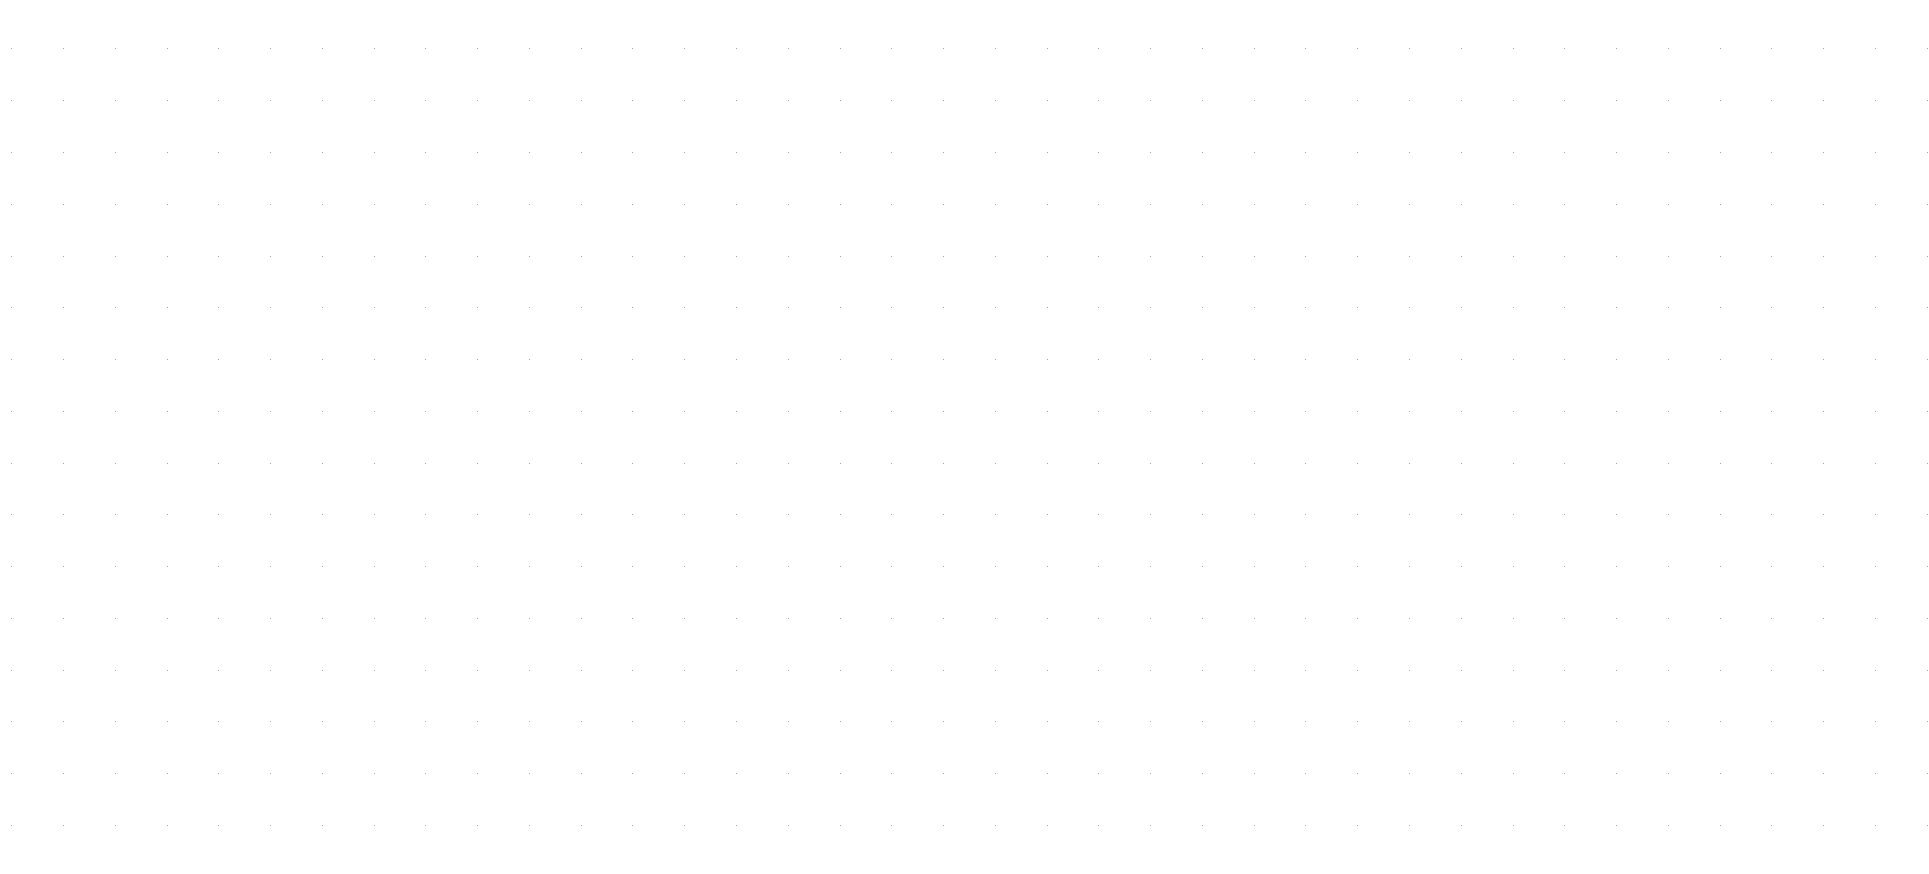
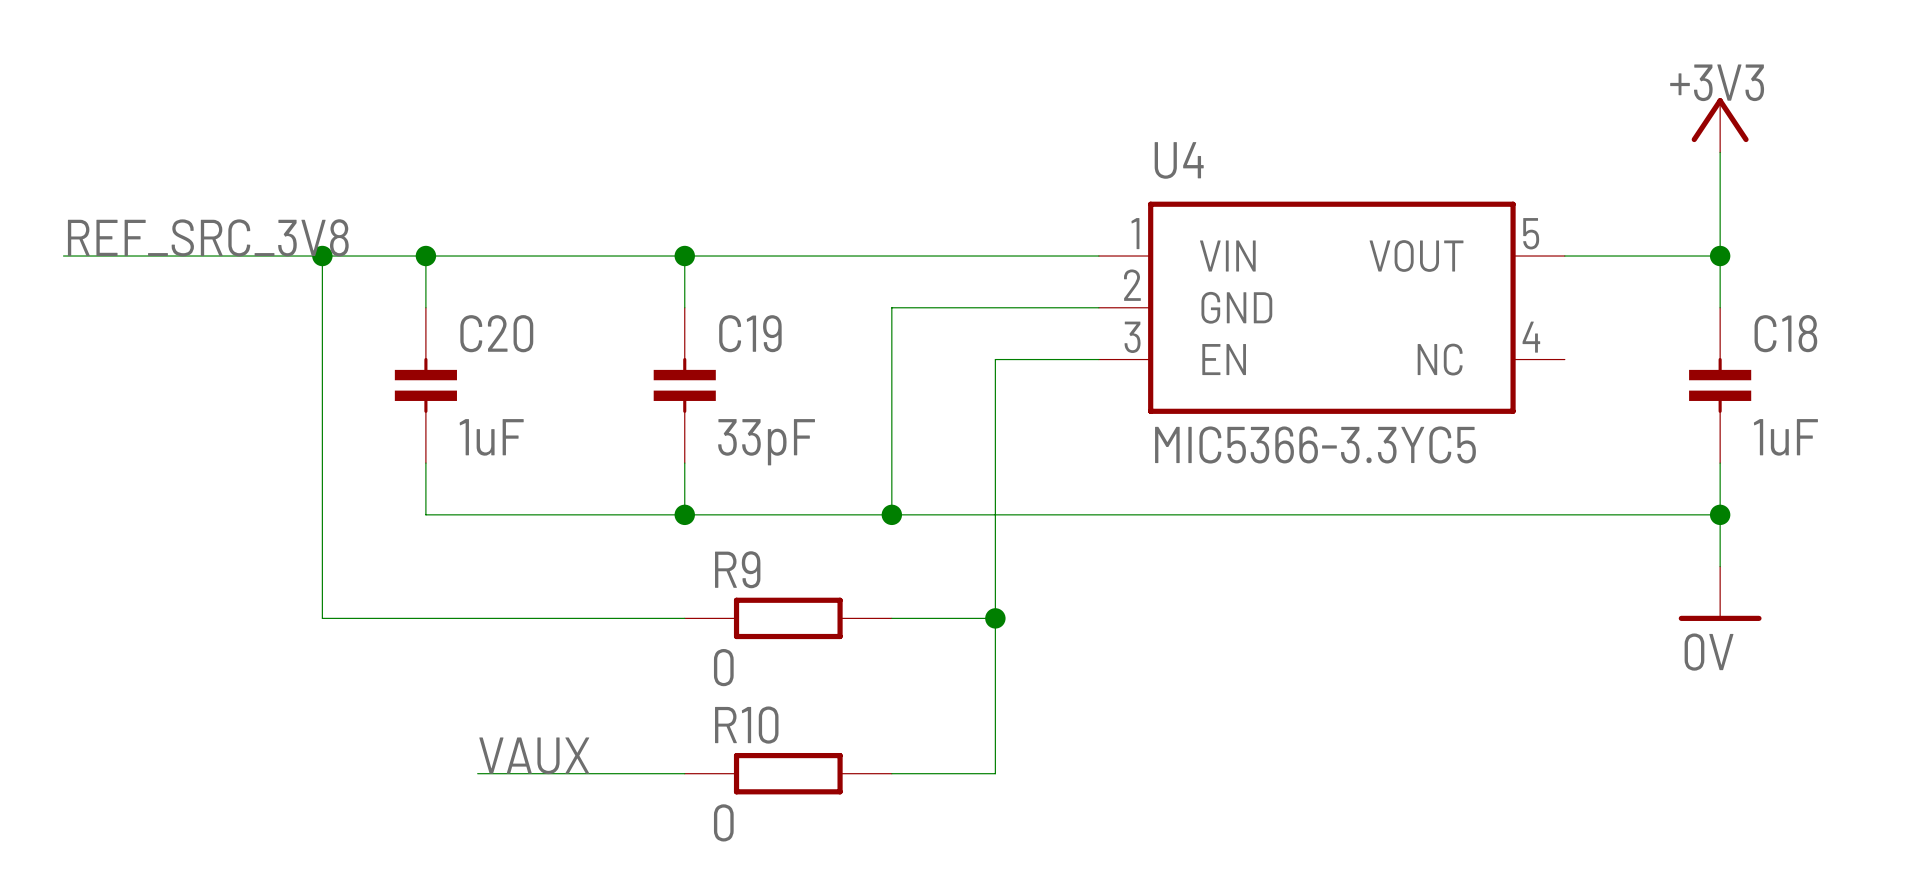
power symbol: none -> +3V3 (1720, 125)
wire: none -> (1720, 152) (1720, 307)
label: none -> REF_SRC_3V8 (208, 237)
wire: none -> (63, 256) (1098, 256)
wire: none -> (322, 256) (322, 618) (684, 618)
junction: none -> (322, 256)
wire: none -> (425, 256) (425, 307)
junction: none -> (425, 256)
wire: none -> (684, 256) (684, 307)
junction: none -> (684, 256)
wire: none -> (1564, 256) (1720, 256)
junction: none -> (1720, 256)
wire: none -> (1098, 307) (891, 307) (891, 514)
U4: none -> MIC5366-3.3YC5 (1331, 307)
wire: none -> (1098, 359) (995, 359) (995, 773) (891, 773)
C20: none -> 1uF (425, 385)
C19: none -> 33pF (684, 385)
C18: none -> 1uF (1720, 385)
wire: none -> (425, 463) (425, 514) (1720, 514)
wire: none -> (684, 463) (684, 514)
wire: none -> (1720, 463) (1720, 566)
junction: none -> (684, 514)
junction: none -> (891, 514)
junction: none -> (1720, 514)
power symbol: none -> 0V (1720, 593)
R9: none -> 0 (788, 618)
wire: none -> (891, 618) (995, 618)
junction: none -> (995, 618)
label: none -> VAUX (534, 755)
wire: none -> (477, 773) (684, 773)
R10: none -> 0 (788, 773)

